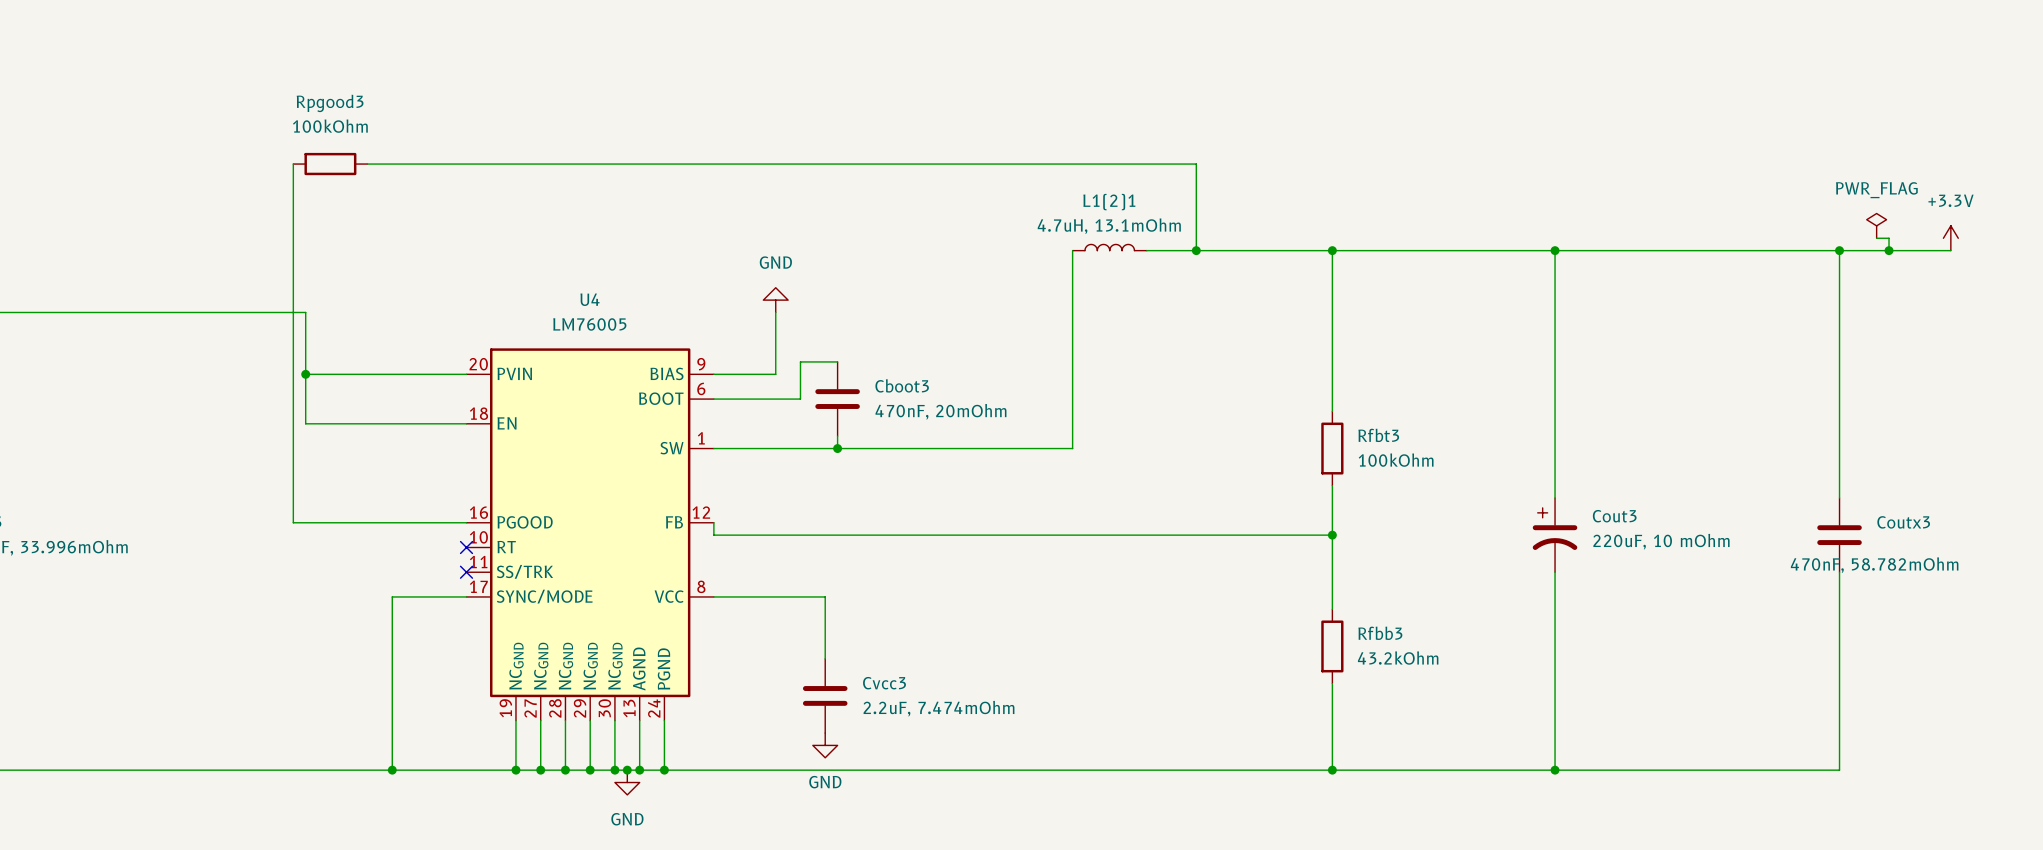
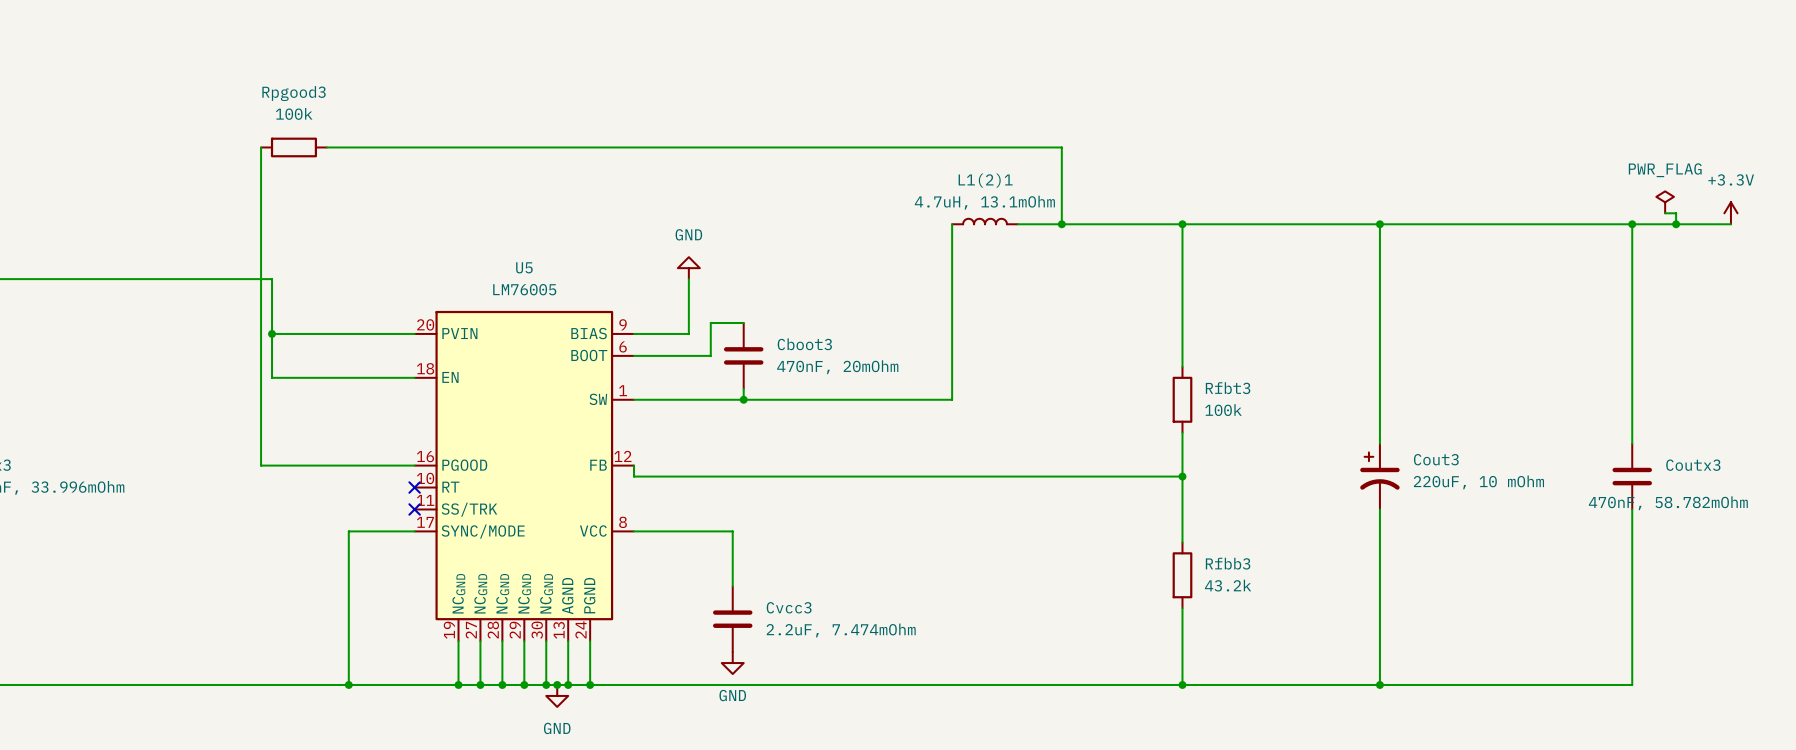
Rpgood3 value: 100kOhm (330, 126) -> 100k (294, 113)
U4 name: U4 (589, 299) -> U5 (524, 267)
Rfbt3 value: 100kOhm (1396, 460) -> 100k (1223, 410)
Rfbb3 value: 43.2kOhm (1398, 658) -> 43.2k (1228, 585)

